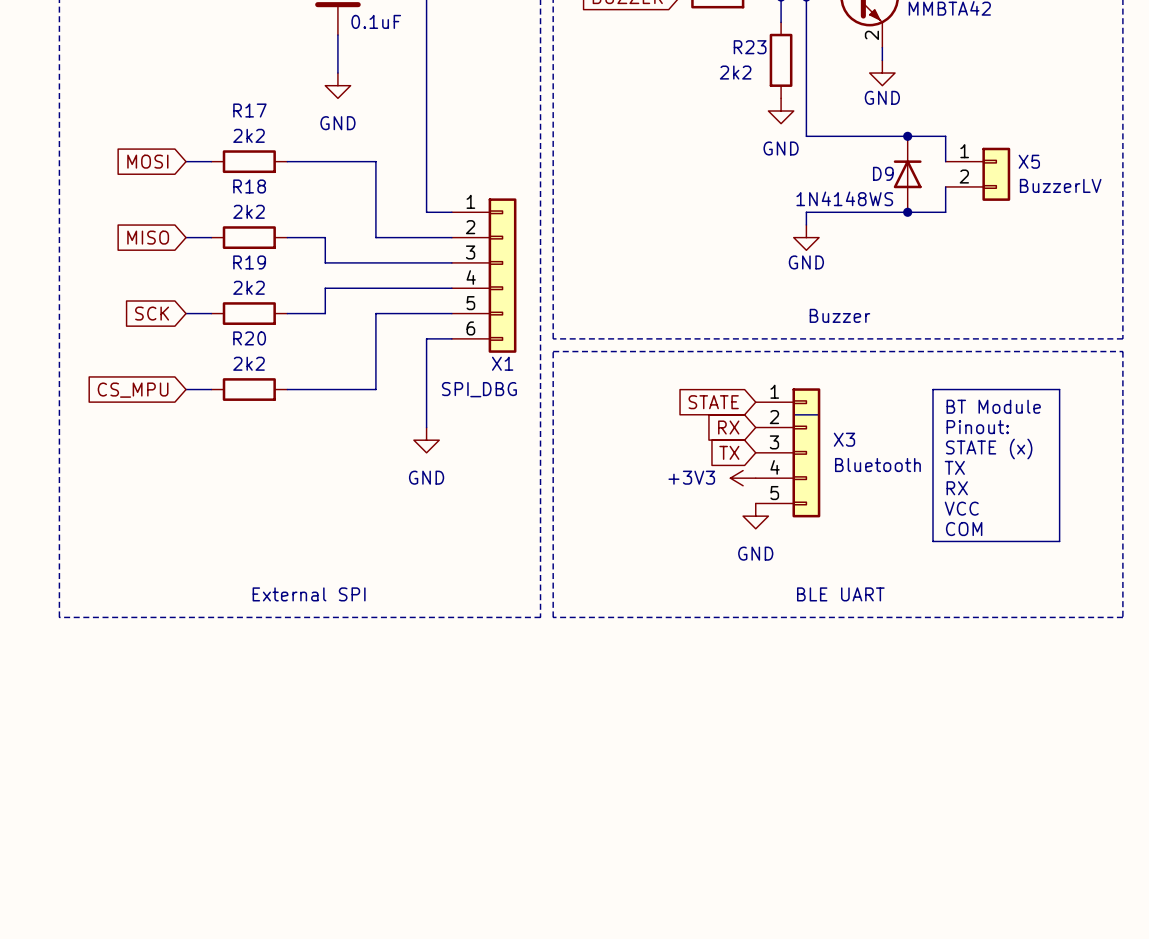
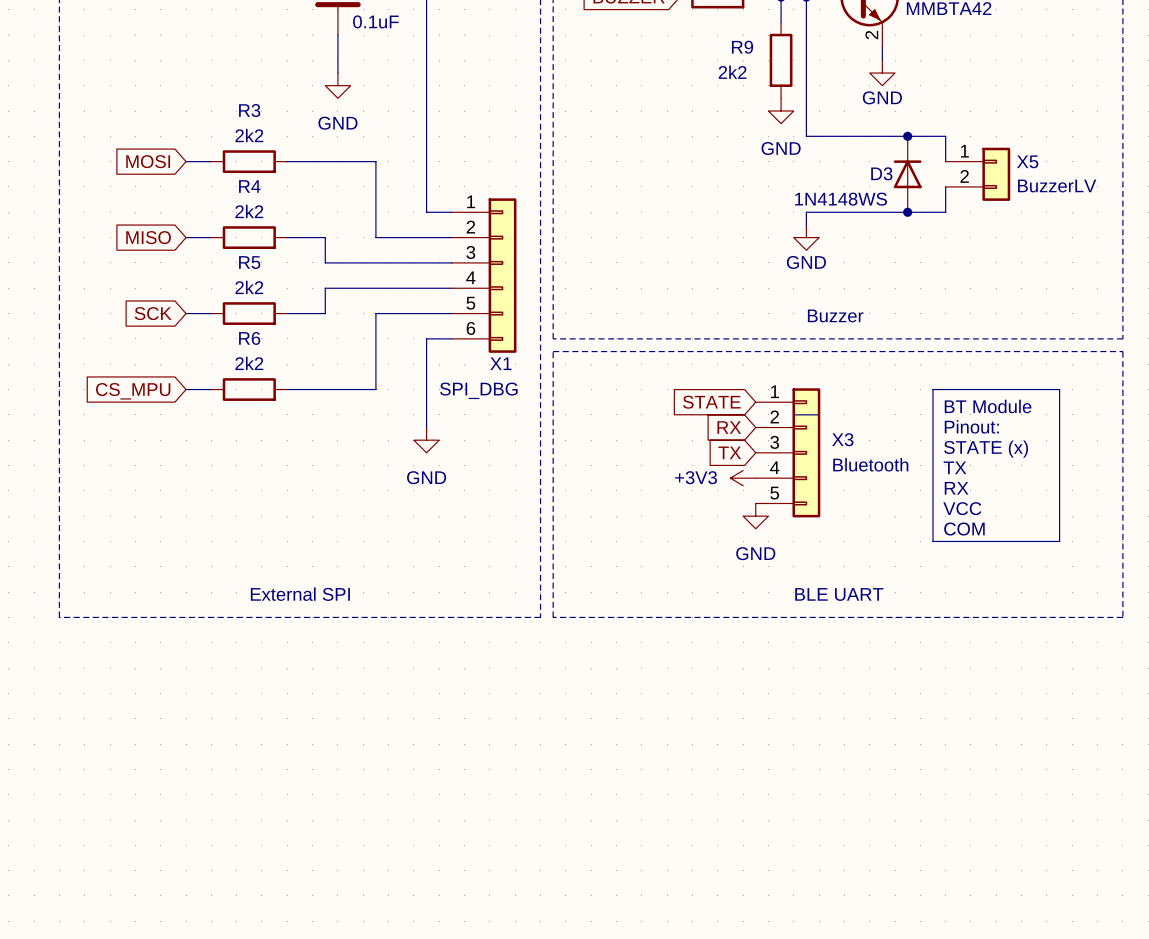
R23 name: R23 (750, 47) -> R9 (742, 47)
R17 name: R17 (249, 110) -> R3 (249, 110)
D9 name: D9 (883, 173) -> D3 (881, 173)
R18 name: R18 (249, 186) -> R4 (249, 186)
R19 name: R19 (249, 262) -> R5 (249, 262)
R20 name: R20 (249, 338) -> R6 (249, 338)

